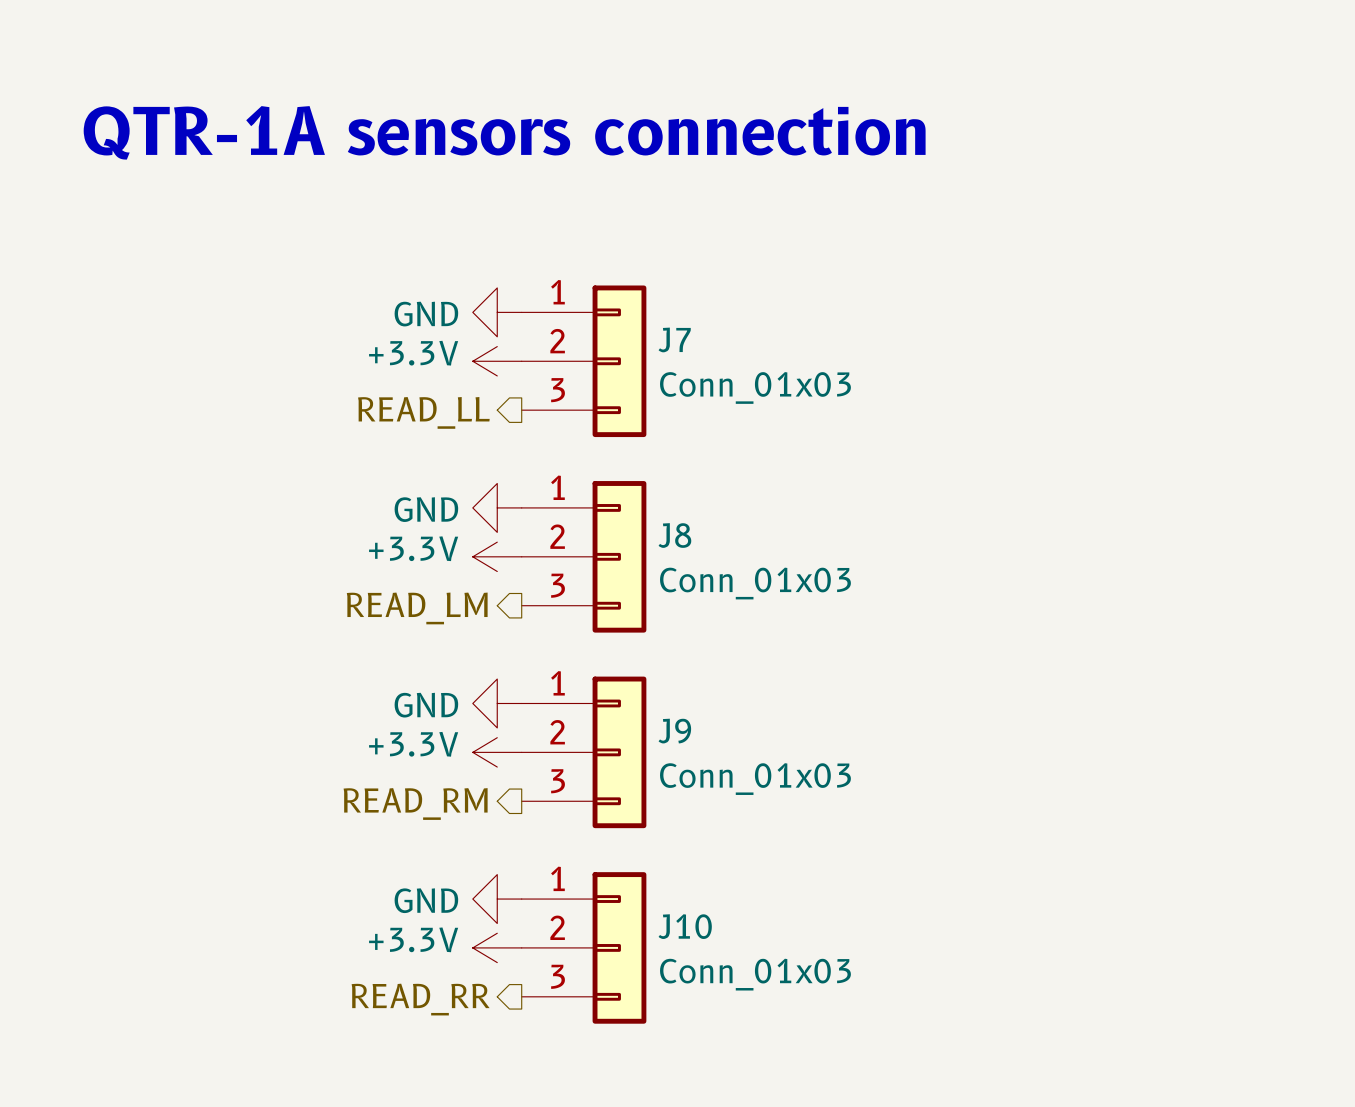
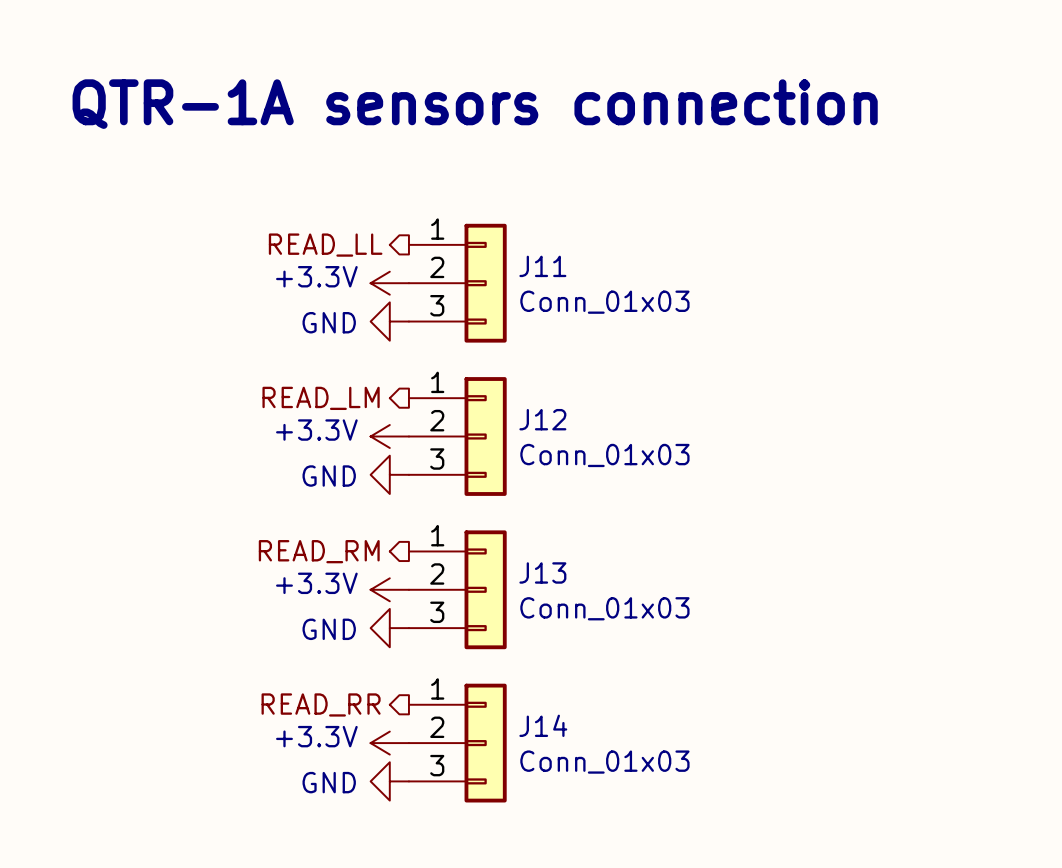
power symbol: GND (497, 312) -> none
J7 name: J7 (674, 339) -> J11 (542, 266)
power symbol: none -> GND (389, 321)
hierarchical label position: READ_LL (423, 412) -> READ_LL (325, 245)
power symbol: GND (497, 507) -> none
J8 name: J8 (674, 535) -> J12 (542, 419)
power symbol: none -> GND (389, 474)
hierarchical label position: READ_LM (417, 608) -> READ_LM (321, 398)
power symbol: GND (497, 703) -> none
J9 name: J9 (674, 731) -> J13 (542, 572)
power symbol: none -> GND (389, 628)
hierarchical label position: READ_RM (415, 804) -> READ_RM (319, 551)
power symbol: GND (497, 899) -> none
J10 name: J10 (685, 926) -> J14 (543, 725)
power symbol: none -> GND (389, 781)
hierarchical label position: READ_RR (420, 999) -> READ_RR (321, 704)

